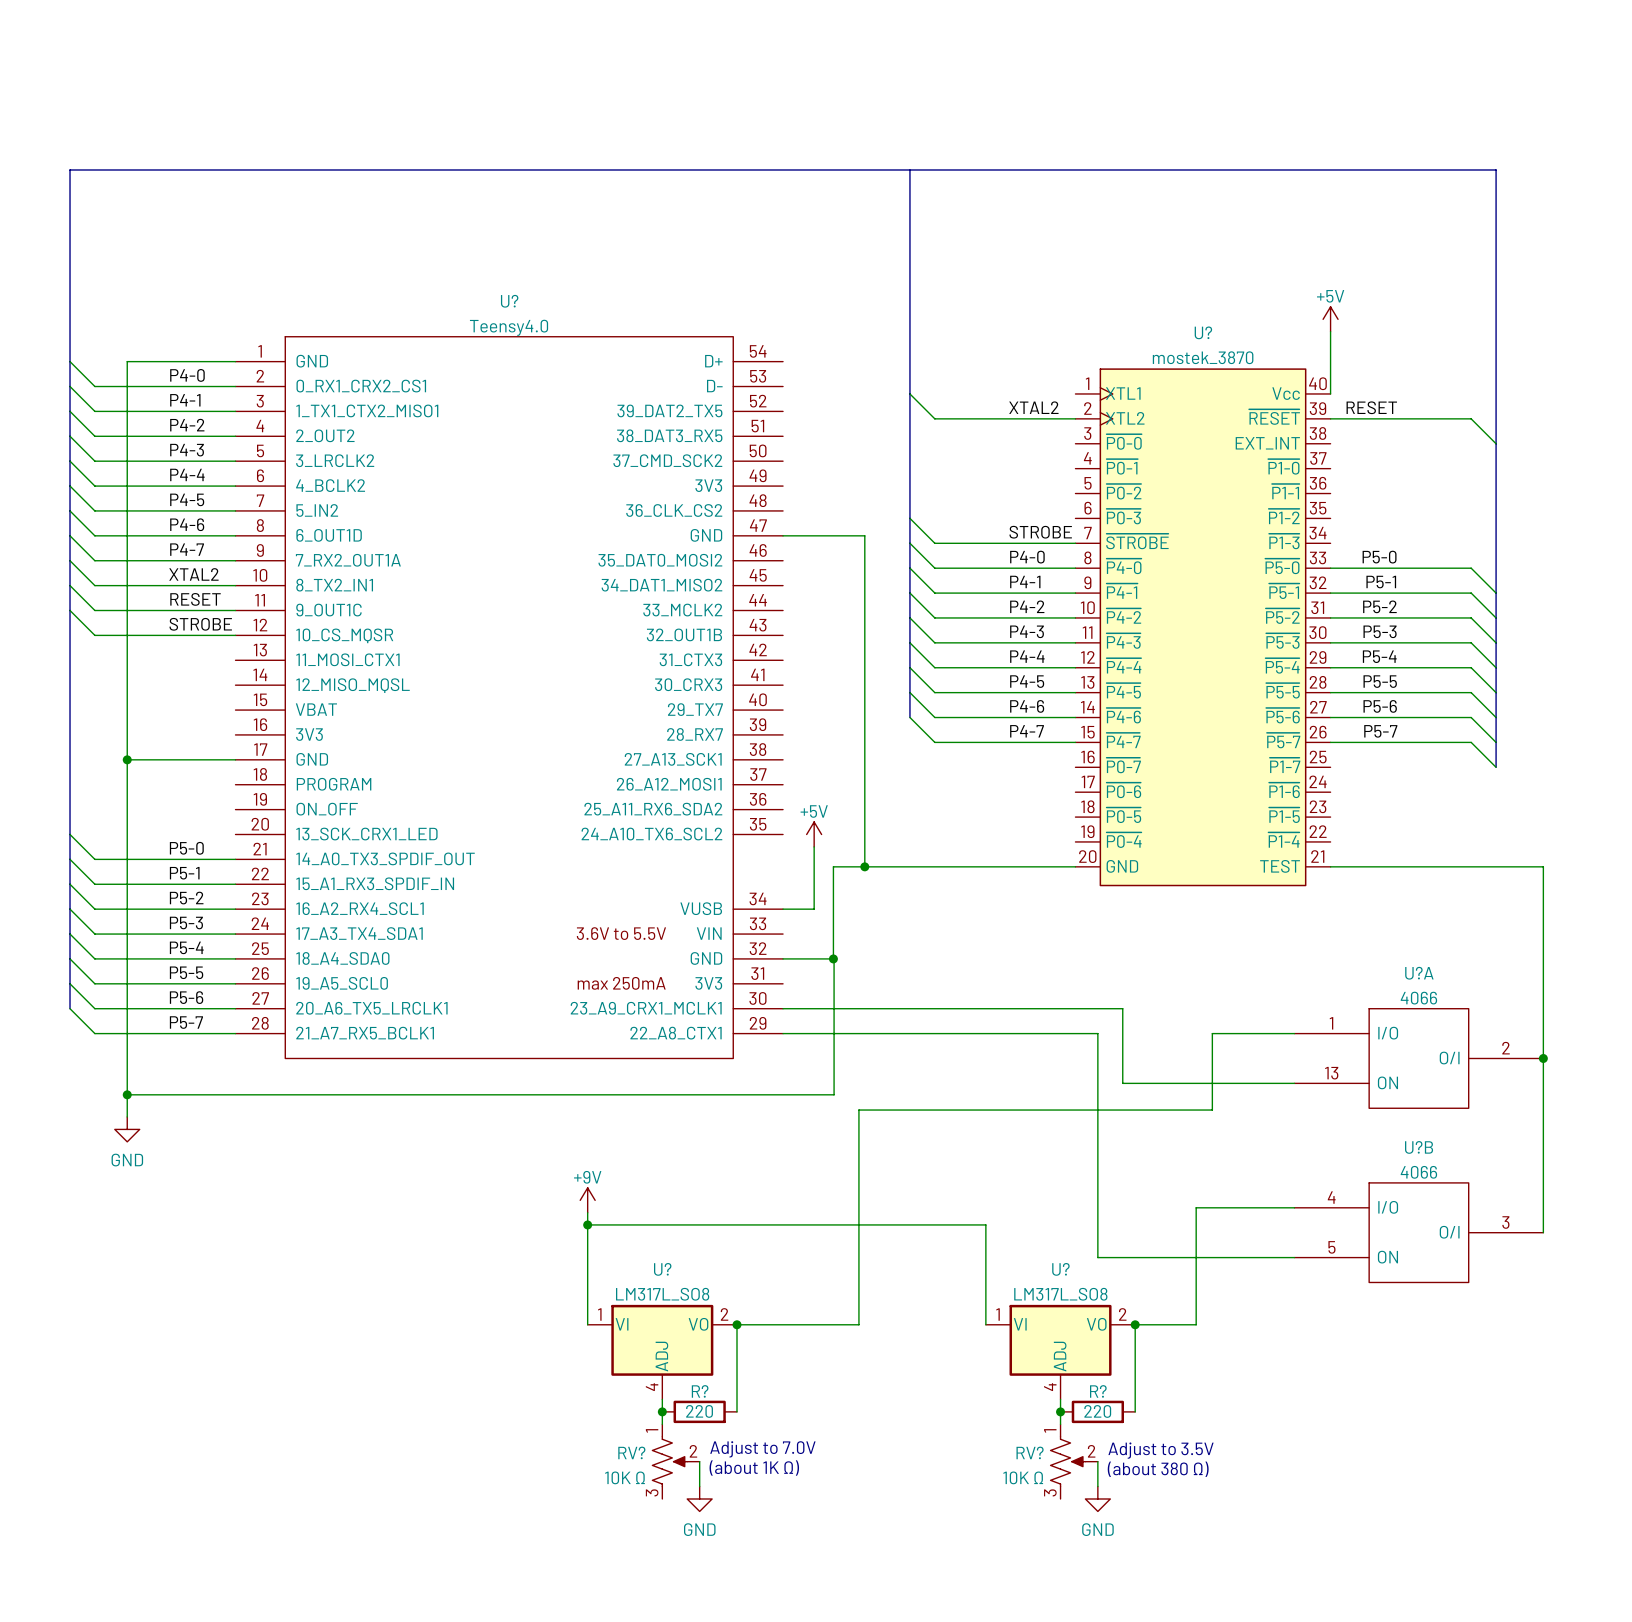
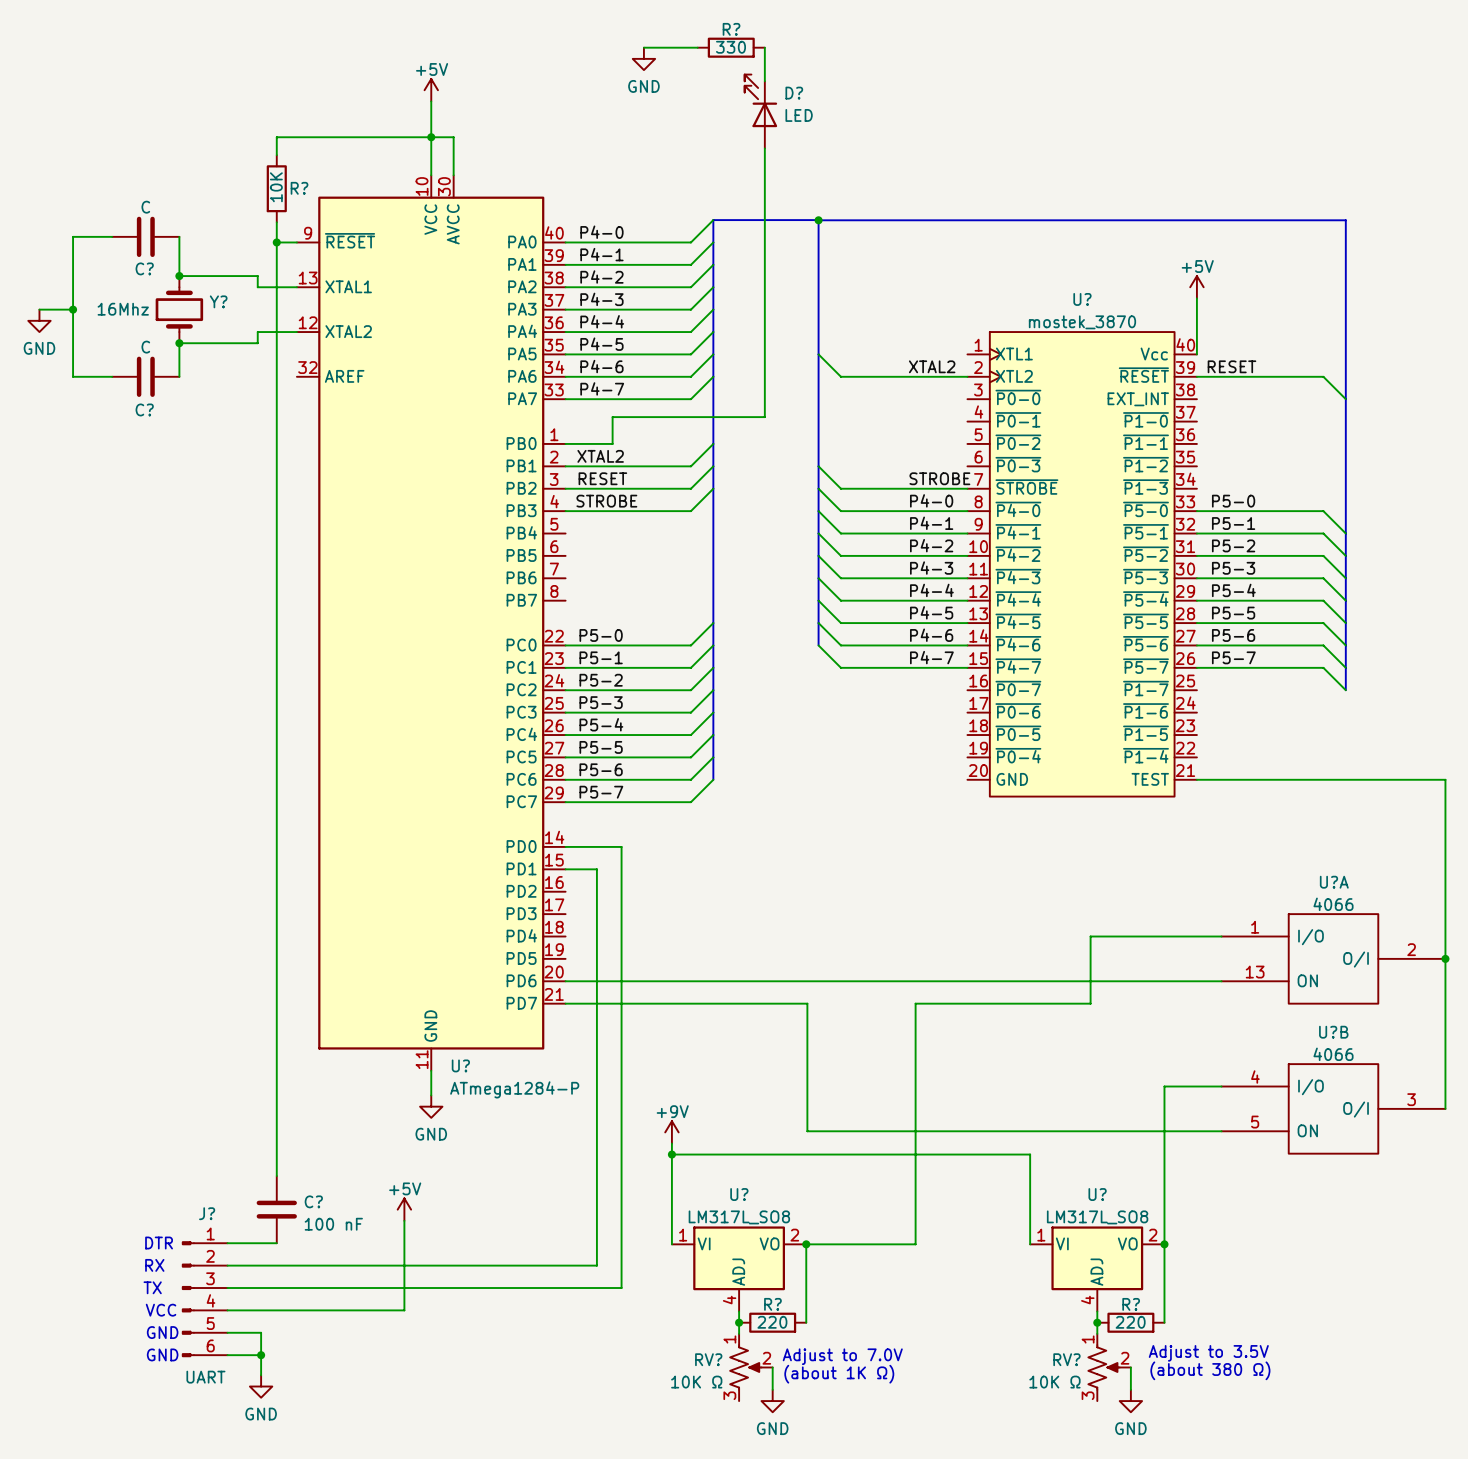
wire: none -> (643, 47) (697, 47)
R?: none -> 330 (731, 47)
wire: none -> (764, 47) (764, 81)
power symbol: none -> GND (643, 58)
power symbol: none -> +5V (431, 90)
wire: none -> (431, 101) (431, 175)
D?: none -> LED (760, 111)
junction: none -> (431, 137)
wire: none -> (764, 148) (764, 417) (612, 417) (612, 443) (565, 443)
bus: (909, 170) (909, 244) -> (1345, 220) (818, 220)
wire: none -> (276, 155) (276, 137) (453, 137) (453, 175)
R?: none -> 10K (276, 188)
wire: none -> (713, 220) (690, 242) (565, 242)
bus: none -> (818, 220) (713, 220) (713, 779)
junction: none -> (818, 220)
bus: (1496, 244) (1496, 169) (70, 169) (70, 1008) -> none
wire: none -> (276, 222) (276, 1176)
label: none -> P4-0 (601, 232)
wire: none -> (112, 236) (73, 236) (73, 376) (112, 376)
C?: none -> C (145, 236)
wire: none -> (179, 236) (179, 276) (257, 276) (257, 287) (296, 287)
wire: none -> (276, 242) (296, 242)
junction: none -> (276, 242)
wire: none -> (713, 242) (690, 264) (565, 264)
label: none -> P4-1 (601, 254)
wire: none -> (713, 264) (690, 287) (565, 287)
junction: none -> (179, 276)
label: none -> P4-2 (601, 276)
wire: none -> (713, 287) (690, 309) (565, 309)
label: none -> P4-3 (601, 299)
wire: none -> (39, 309) (73, 309)
junction: none -> (73, 309)
Y?: none -> 16Mhz (179, 309)
wire: none -> (713, 309) (690, 332) (565, 332)
power symbol: none -> GND (39, 320)
label: none -> P4-4 (602, 321)
wire: (70, 361) (94, 386) (235, 386) -> none
wire: (235, 361) (127, 361) (127, 1116) -> none
wire: none -> (296, 332) (257, 332) (257, 343) (179, 343) (179, 376)
wire: none -> (713, 332) (690, 354) (565, 354)
label: P4-0 (187, 375) -> none
junction: none -> (179, 343)
label: none -> P4-5 (601, 344)
wire: (70, 386) (94, 411) (235, 411) -> none
wire: none -> (713, 354) (690, 376) (565, 376)
label: P4-1 (185, 400) -> none
label: none -> P4-6 (601, 366)
wire: (70, 411) (94, 436) (235, 436) -> none
C?: none -> C (145, 376)
wire: none -> (713, 376) (690, 399) (565, 399)
label: P4-2 (187, 425) -> none
label: none -> P4-7 (602, 388)
wire: (70, 436) (94, 461) (235, 461) -> none
label: P4-3 (187, 450) -> none
wire: (70, 461) (94, 486) (235, 486) -> none
label: P4-4 (187, 474) -> none
wire: (70, 486) (94, 510) (235, 510) -> none
wire: none -> (713, 443) (690, 466) (565, 466)
label: P4-5 (187, 499) -> none
label: none -> XTAL2 (600, 456)
wire: (70, 510) (94, 535) (235, 535) -> none
wire: none -> (713, 466) (690, 488) (565, 488)
label: P4-6 (187, 524) -> none
label: none -> RESET (602, 478)
wire: (70, 535) (94, 560) (235, 560) -> none
wire: (783, 535) (864, 535) (864, 866) -> none
wire: none -> (713, 488) (690, 511) (565, 511)
label: P4-7 (187, 549) -> none
label: none -> STROBE (606, 501)
wire: (70, 560) (94, 585) (235, 585) -> none
label: XTAL2 (193, 574) -> none
wire: (70, 585) (94, 610) (235, 610) -> none
label: RESET (195, 599) -> none
wire: (70, 610) (94, 635) (235, 635) -> none
label: STROBE (200, 624) -> none
U?: none -> ATmega1284-P (431, 623)
wire: none -> (713, 623) (690, 645) (565, 645)
U?: Teensy4.0 (509, 697) -> none
label: none -> P5-0 (601, 635)
wire: none -> (713, 645) (690, 667) (565, 667)
label: none -> P5-1 (601, 657)
wire: none -> (713, 667) (690, 690) (565, 690)
label: none -> P5-2 (601, 680)
wire: (127, 759) (235, 759) -> none
junction: (127, 759) -> none
wire: none -> (713, 690) (690, 712) (565, 712)
label: none -> P5-3 (601, 702)
wire: none -> (713, 712) (690, 735) (565, 735)
label: none -> P5-4 (601, 724)
wire: none -> (713, 735) (690, 757) (565, 757)
label: none -> P5-5 (601, 747)
wire: (70, 834) (94, 859) (235, 859) -> none
power symbol: +5V (814, 834) -> none
wire: none -> (713, 757) (690, 779) (565, 779)
wire: (814, 846) (814, 909) (783, 909) -> none
label: P5-0 (186, 848) -> none
label: none -> P5-6 (601, 769)
wire: (70, 859) (94, 884) (235, 884) -> none
wire: none -> (713, 779) (690, 802) (565, 802)
junction: (864, 866) -> none
wire: (1075, 866) (833, 866) (833, 958) -> none
wire: (1543, 866) (1543, 1232) -> (1388, 779) (1445, 779) (1445, 1108)
label: P5-1 (184, 873) -> none
label: none -> P5-7 (601, 792)
wire: (70, 884) (94, 909) (235, 909) -> none
label: P5-2 (186, 898) -> none
wire: (70, 909) (94, 934) (235, 934) -> none
label: P5-3 (186, 923) -> none
wire: (70, 934) (94, 958) (235, 958) -> none
wire: none -> (565, 846) (621, 846) (621, 1288) (227, 1288)
label: P5-4 (186, 947) -> none
wire: (70, 958) (94, 983) (235, 983) -> none
wire: (783, 958) (834, 958) (834, 1094) (127, 1094) -> none
junction: (833, 958) -> none
wire: none -> (565, 869) (596, 869) (596, 1265) (227, 1265)
label: P5-5 (186, 972) -> none
wire: (70, 983) (94, 1008) (235, 1008) -> none
label: P5-6 (186, 997) -> none
wire: (70, 1008) (94, 1033) (235, 1033) -> none
wire: (783, 1008) (1122, 1008) (1122, 1083) (1294, 1083) -> none
label: P5-7 (186, 1022) -> none
wire: (783, 1033) (1097, 1033) (1097, 1257) -> (565, 1003) (807, 1003) (807, 1131) (987, 1131)
wire: (1294, 1033) (1212, 1033) (1212, 1041) -> (1221, 936) (1090, 936)
U?A position: (1418, 1058) -> (1333, 958)
junction: (1543, 1058) -> none
junction: none -> (1445, 958)
wire: none -> (565, 981) (1221, 981)
junction: (127, 1094) -> none
wire: (1212, 1110) (858, 1110) (858, 1324) (737, 1324) (737, 1411) -> (1090, 998) (1090, 1003) (915, 1003) (915, 1244) (806, 1244) (806, 1322)
power symbol: GND (127, 1129) -> none
wire: none -> (431, 1070) (431, 1095)
power symbol position: +9V (587, 1200) -> +9V (671, 1132)
wire: (1294, 1207) (1196, 1207) (1196, 1324) (1135, 1324) (1135, 1411) -> none
wire: none -> (1221, 1086) (1164, 1086) (1164, 1322)
wire: (587, 1212) (587, 1324) -> (671, 1143) (671, 1244)
wire: (587, 1224) (985, 1224) (985, 1324) -> (671, 1154) (1030, 1154) (1030, 1244)
junction: (587, 1224) -> none
power symbol: none -> GND (431, 1106)
U?B position: (1418, 1232) -> (1333, 1108)
junction position: (737, 1324) -> (671, 1154)
junction: (1135, 1324) -> none
C?: none -> 100 nF (276, 1209)
power symbol: none -> +5V (404, 1209)
U?: LM317L_SO8 (662, 1352) -> none
U?: LM317L_SO8 (1060, 1352) -> none
wire: none -> (404, 1220) (404, 1310) (227, 1310)
text: none -> DTR (159, 1243)
wire: none -> (227, 1243) (276, 1243)
junction: none -> (806, 1244)
junction: none -> (1164, 1244)
wire: (662, 1399) (662, 1424) -> (739, 1311) (739, 1333)
wire: (1060, 1399) (1060, 1424) -> (1097, 1311) (1097, 1333)
text: none -> RX (154, 1265)
U?: none -> LM317L_SO8 (739, 1268)
U?: none -> LM317L_SO8 (1097, 1268)
junction: (662, 1411) -> none
R?: 220 (699, 1411) -> none
junction: (1060, 1411) -> none
R?: 220 (1097, 1411) -> none
text: none -> TX (152, 1287)
J?: none -> UART (204, 1299)
text position: Adjust to 7.0V (762, 1449) -> Adjust to 7.0V (842, 1356)
text position: Adjust to 3.5V (1161, 1450) -> Adjust to 3.5V (1208, 1353)
text: none -> VCC (161, 1310)
RV?: 10K Ω (676, 1461) -> none
wire: (699, 1461) (699, 1486) -> (772, 1367) (772, 1389)
RV?: 10K Ω (1074, 1461) -> none
wire: (1097, 1461) (1097, 1486) -> (1130, 1367) (1130, 1389)
text position: (about 1K Ω) (754, 1468) -> (about 1K Ω) (839, 1374)
text position: (about 380 Ω) (1158, 1469) -> (about 380 Ω) (1210, 1370)
junction: none -> (739, 1322)
R?: none -> 220 (772, 1322)
junction: none -> (1097, 1322)
R?: none -> 220 (1130, 1322)
text: none -> GND (162, 1332)
wire: none -> (227, 1332) (261, 1332) (261, 1375)
power symbol: GND (699, 1498) -> none
power symbol: GND (1097, 1498) -> none
text: none -> GND (162, 1354)
wire: none -> (227, 1355) (261, 1355)
junction: none -> (261, 1355)
RV?: none -> 10K Ω (751, 1367)
RV?: none -> 10K Ω (1109, 1367)
power symbol: none -> GND (261, 1386)
power symbol: none -> GND (772, 1401)
power symbol: none -> GND (1130, 1401)

